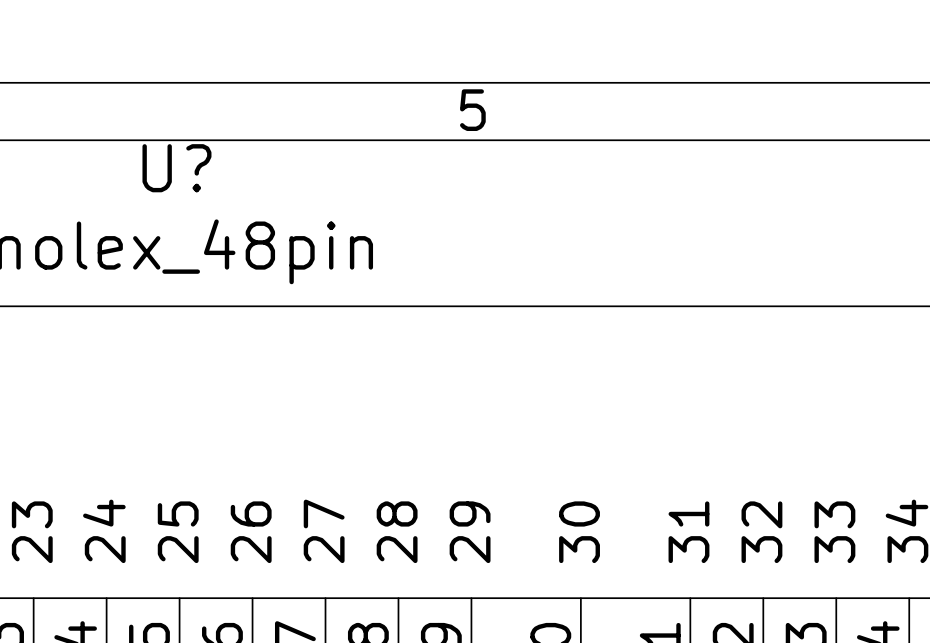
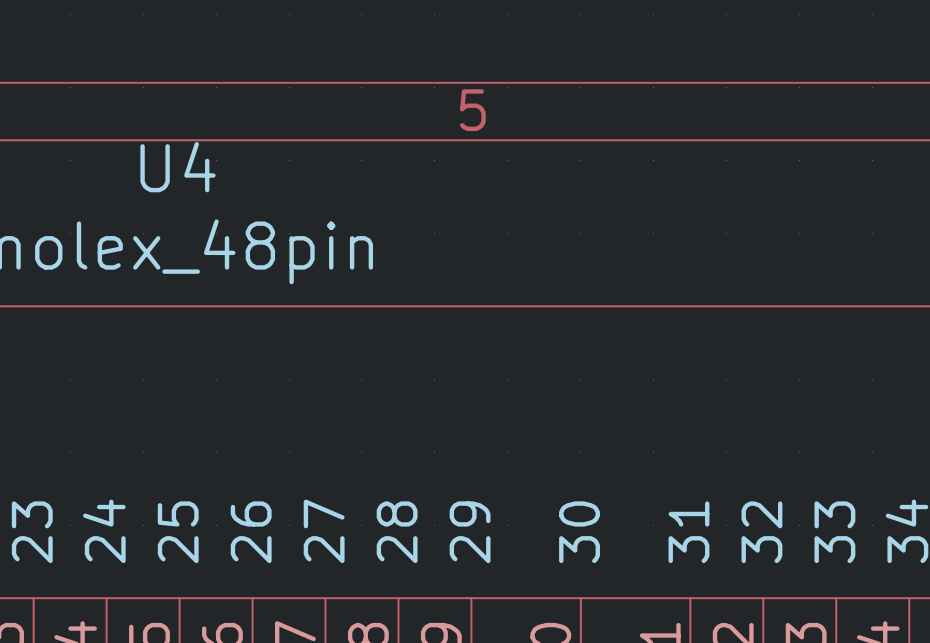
U? name: U? (176, 168) -> U4 (178, 167)

